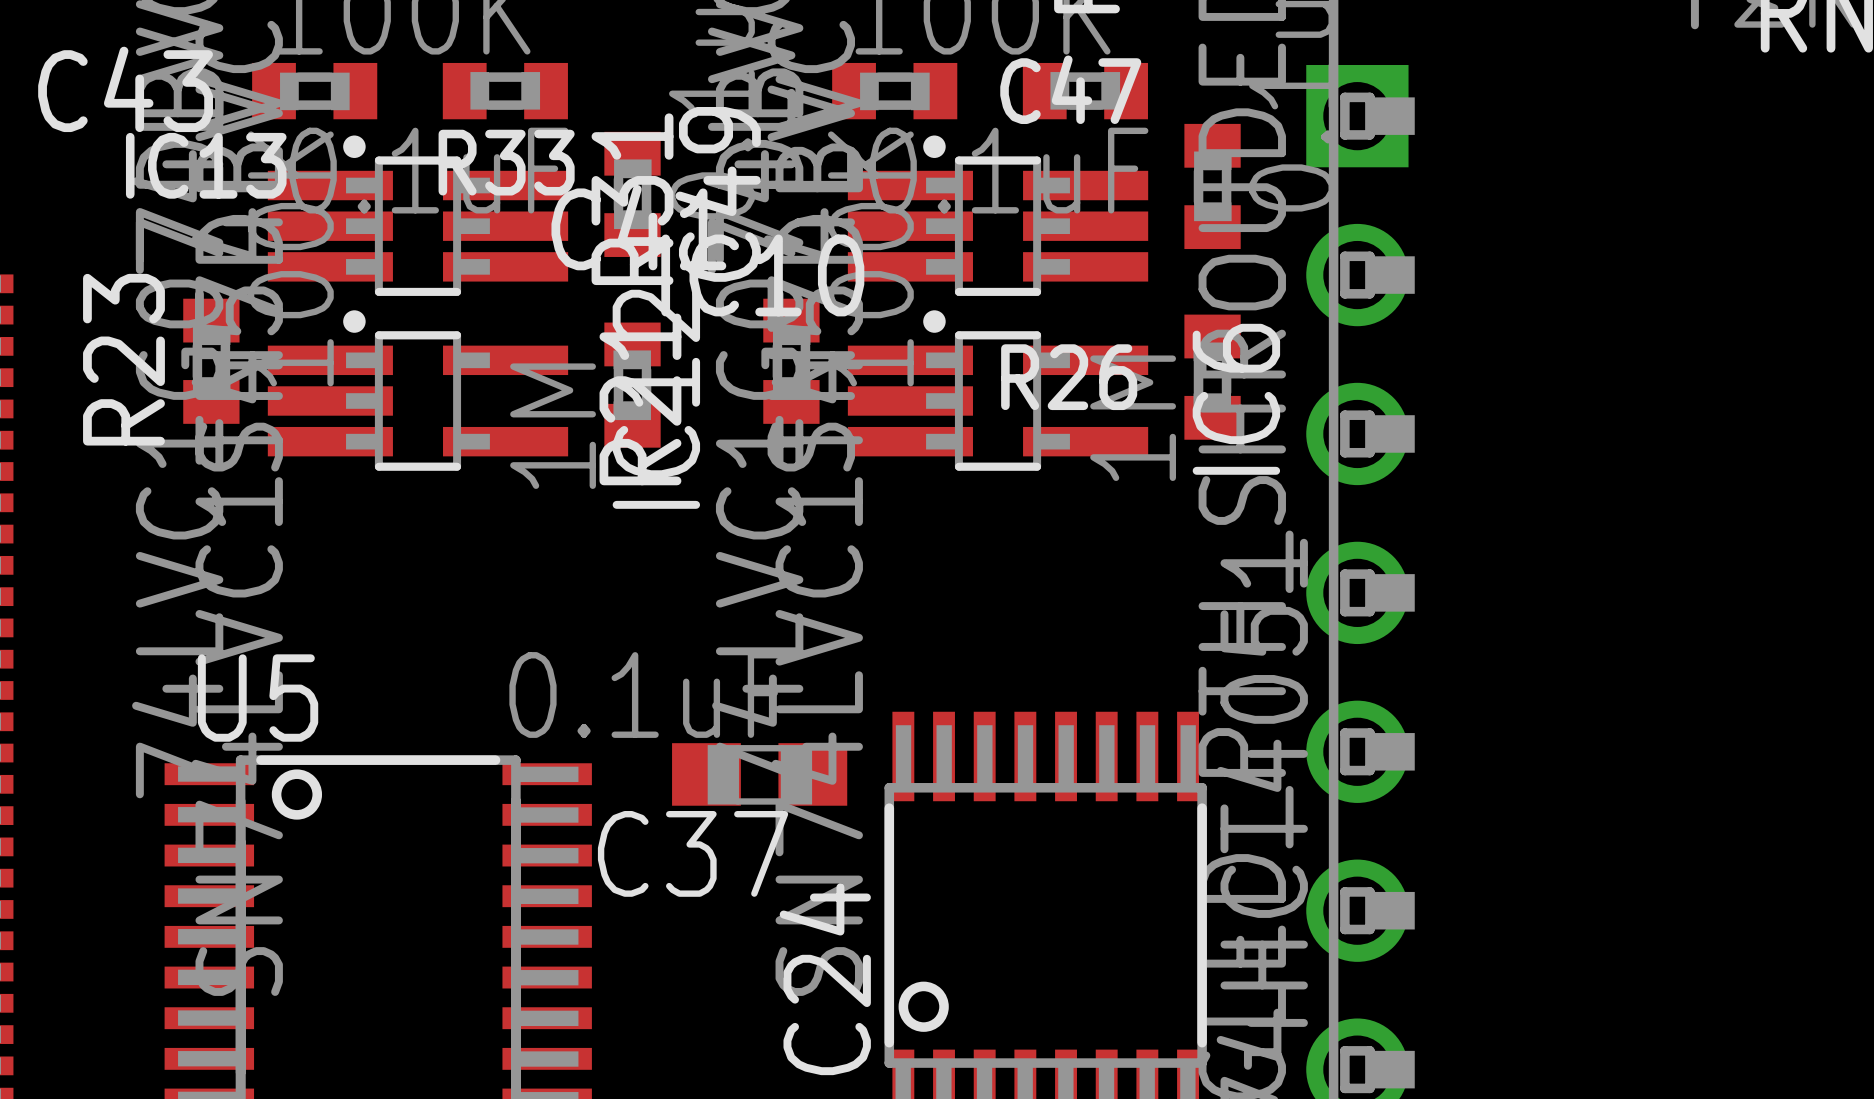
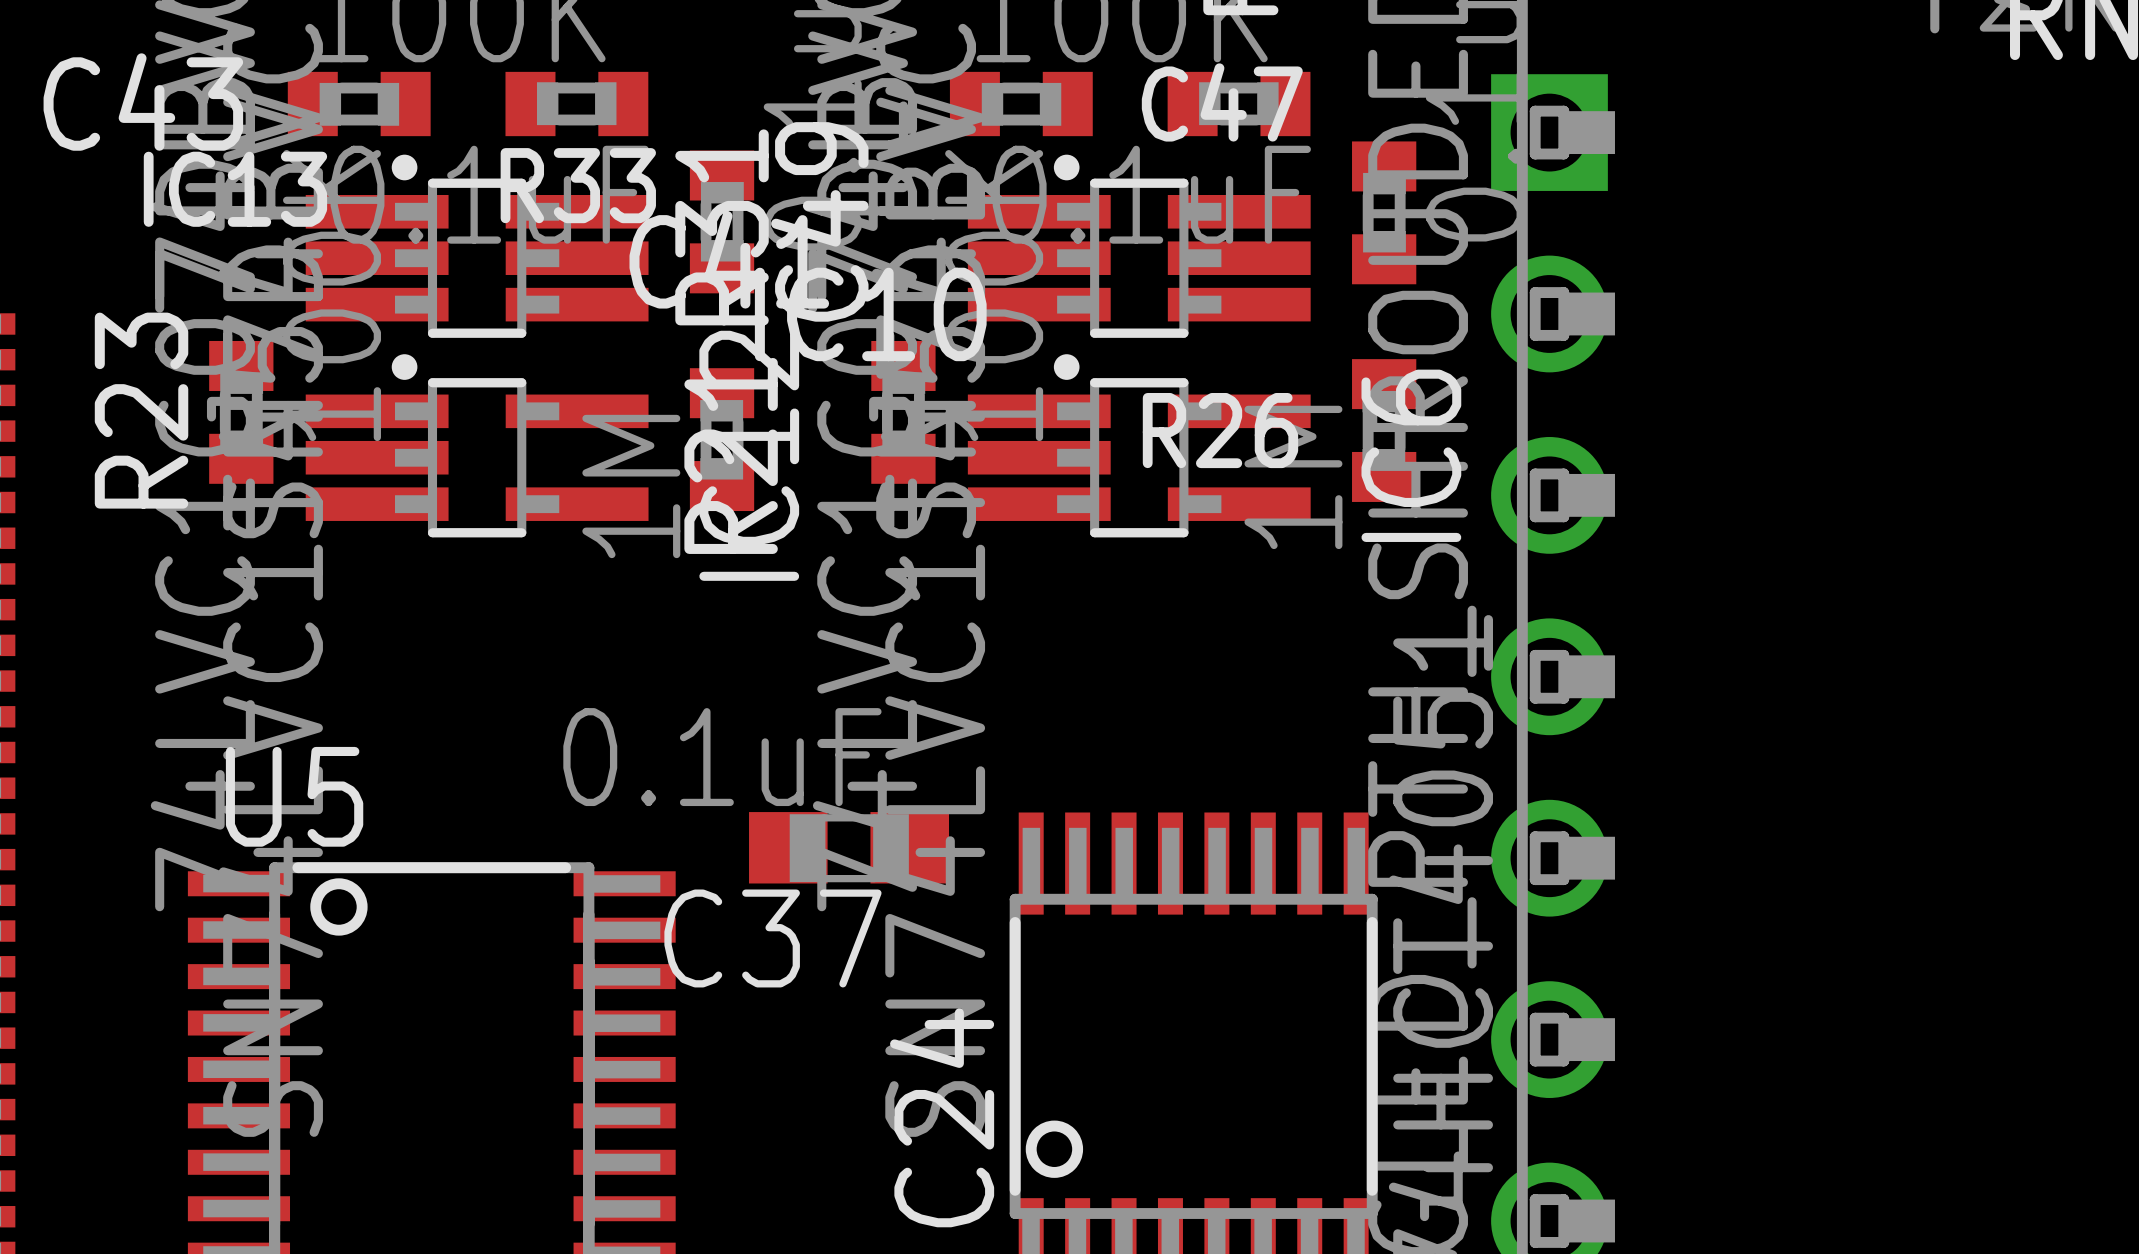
C37 position: (759, 774) -> (849, 847)

